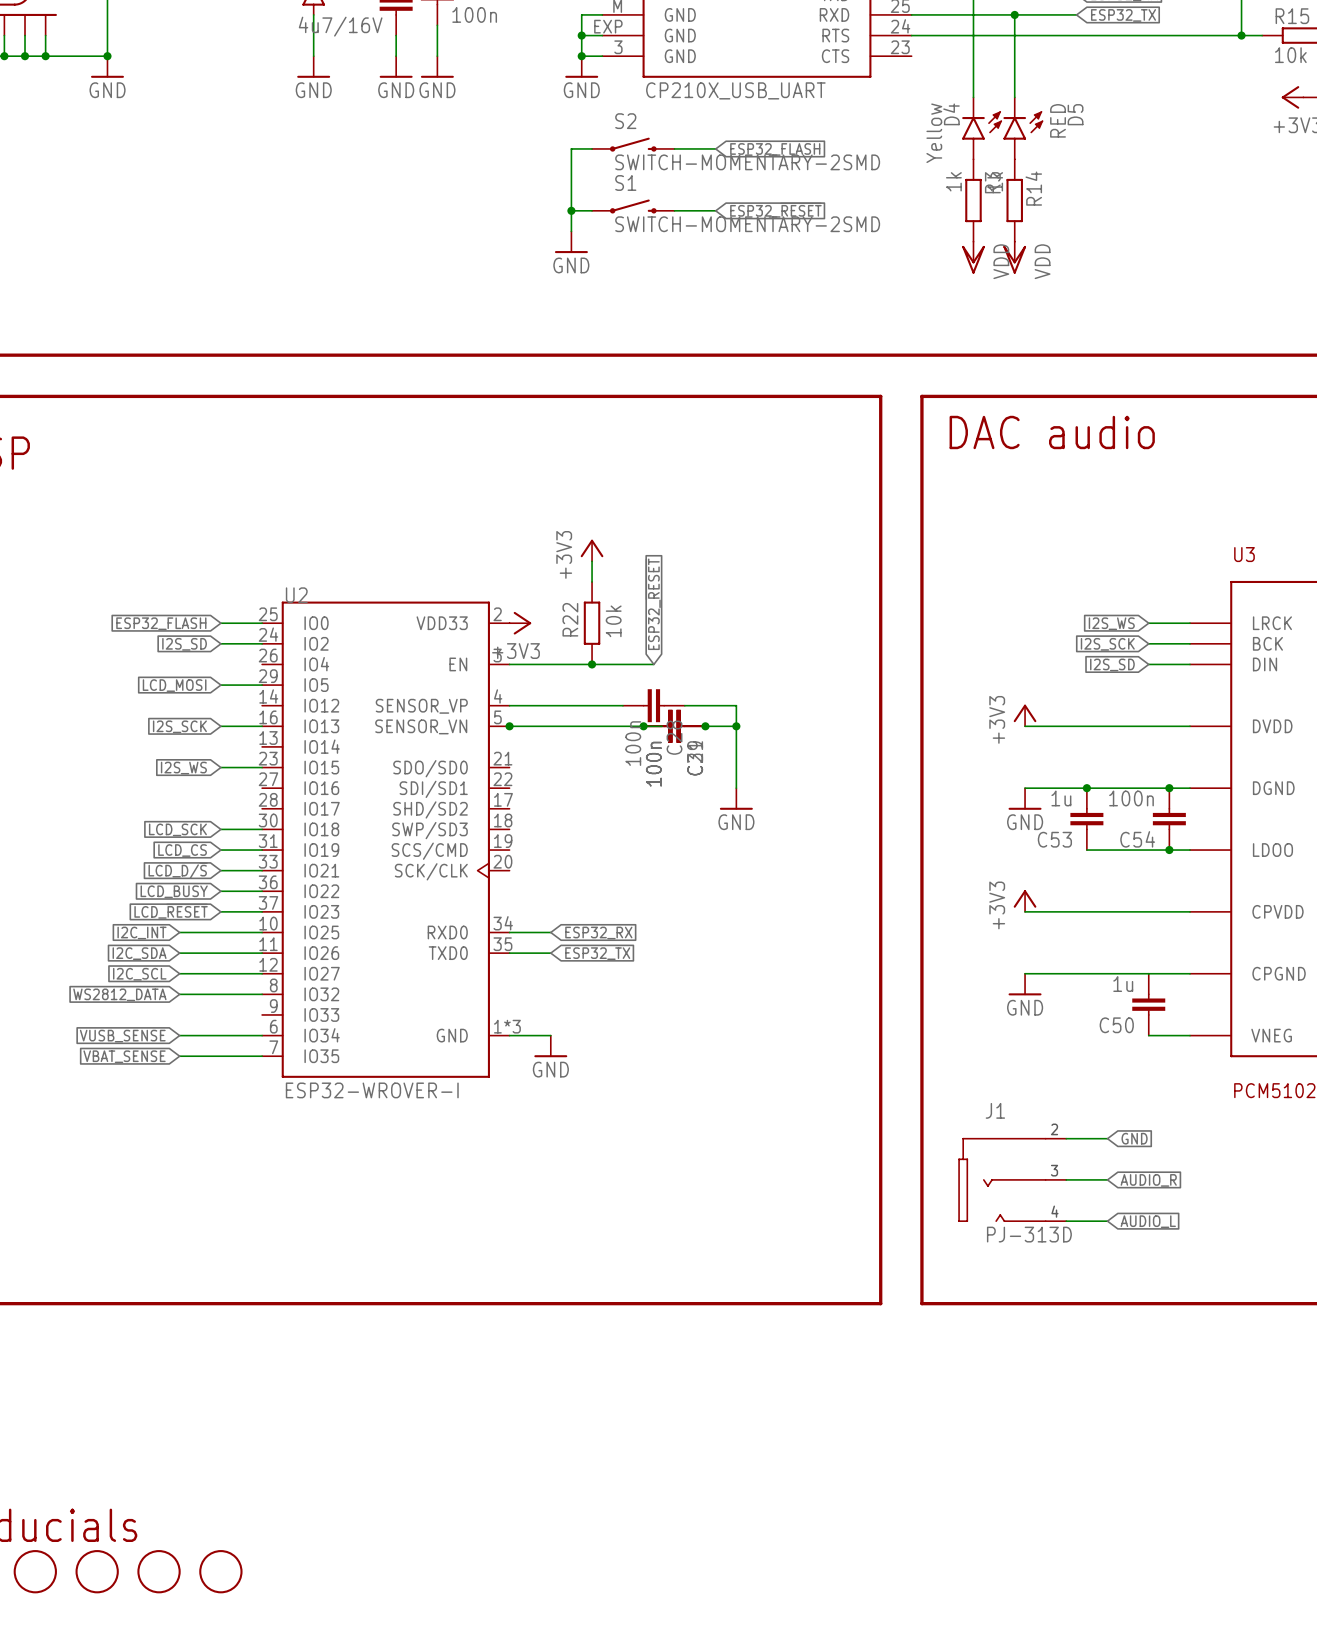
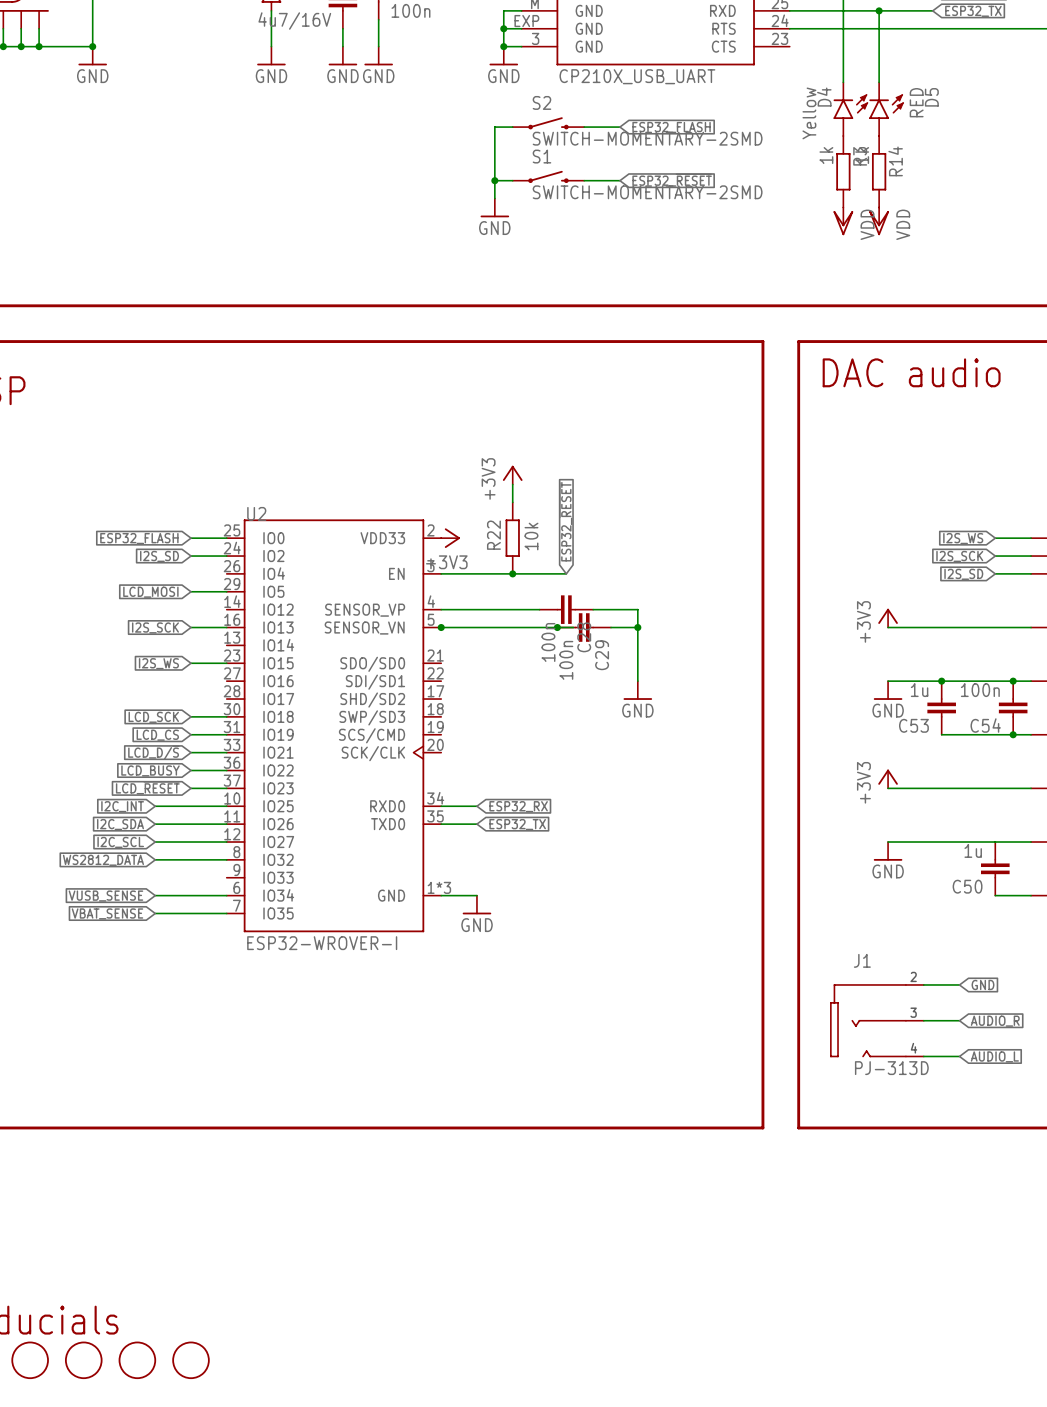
part: 100n (674, 726) -> none
junction: (705, 726) -> none

